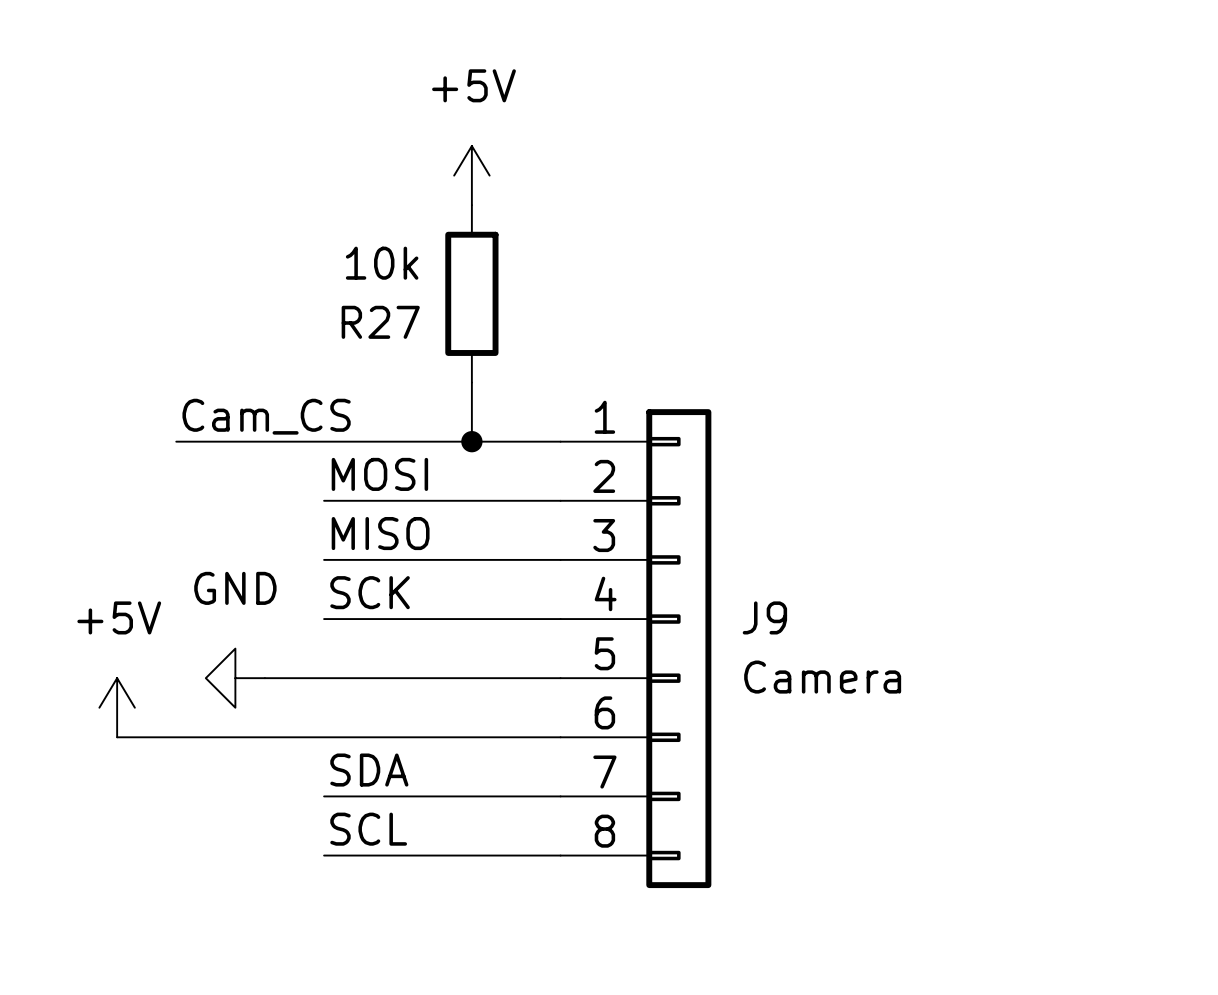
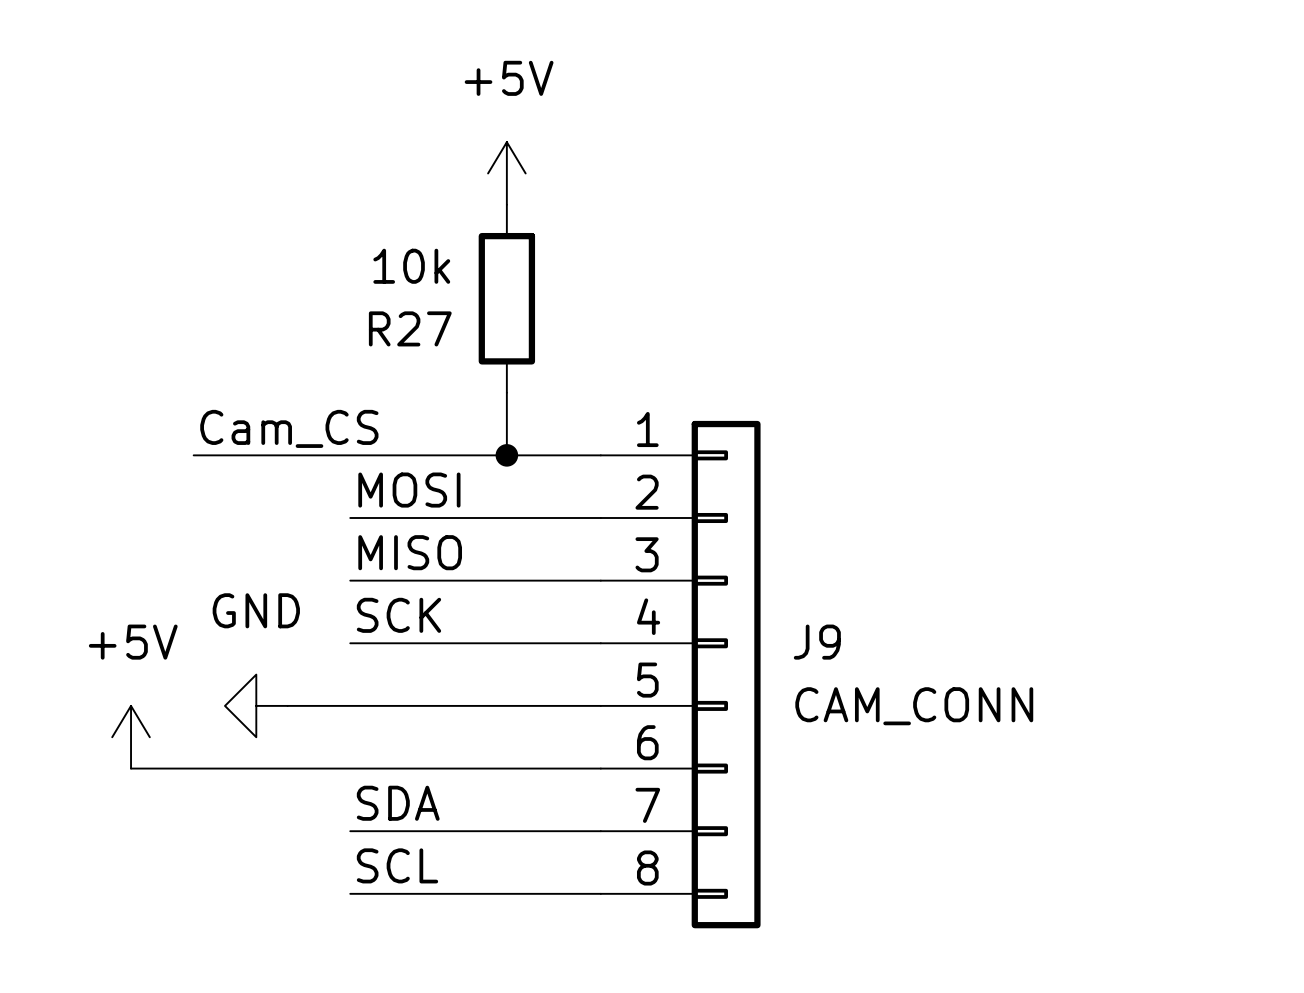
J9 value: Camera (822, 677) -> CAM_CONN (914, 706)

